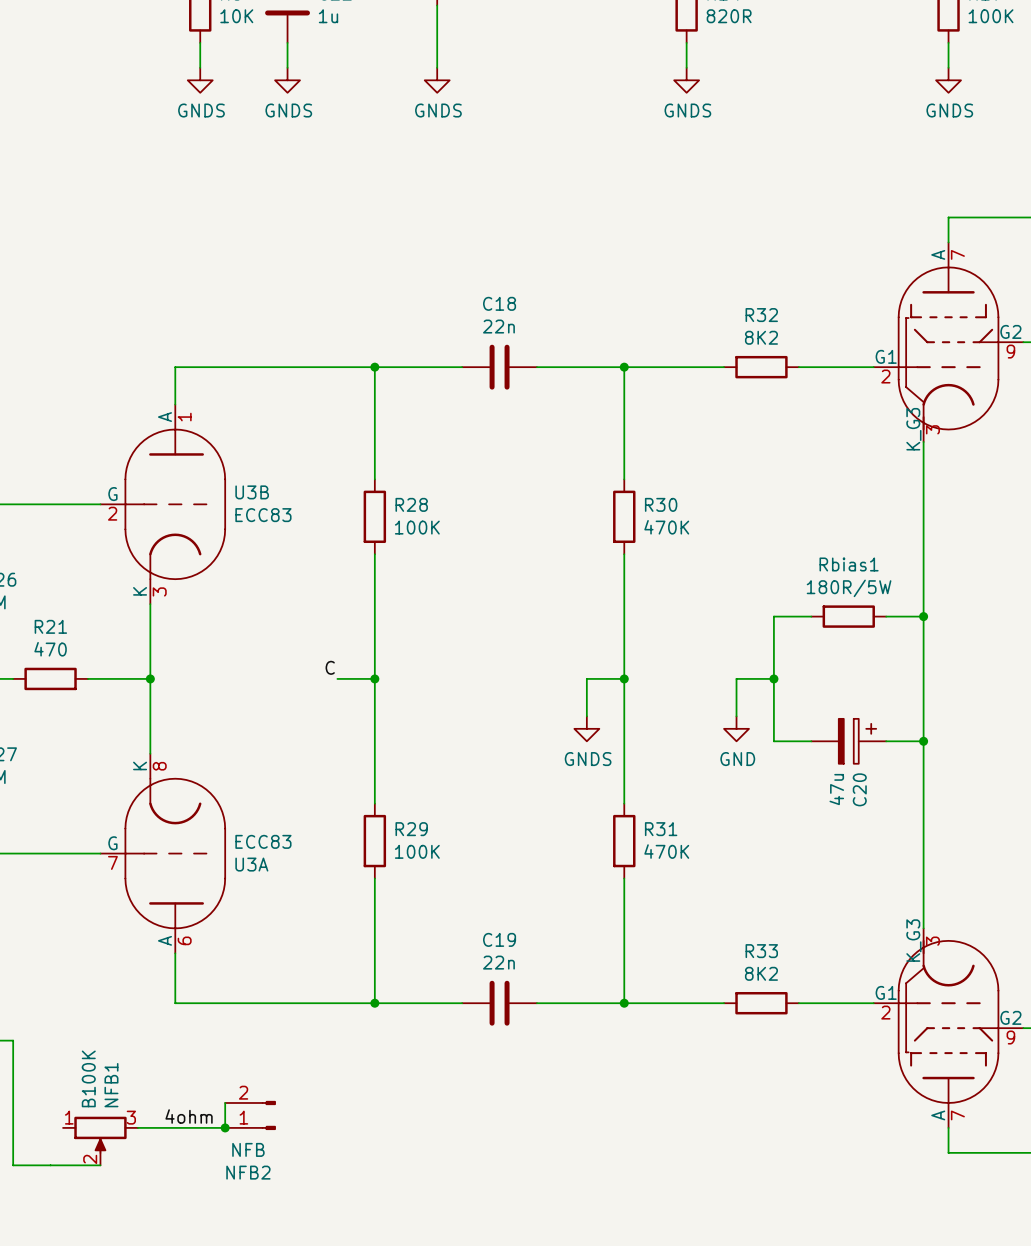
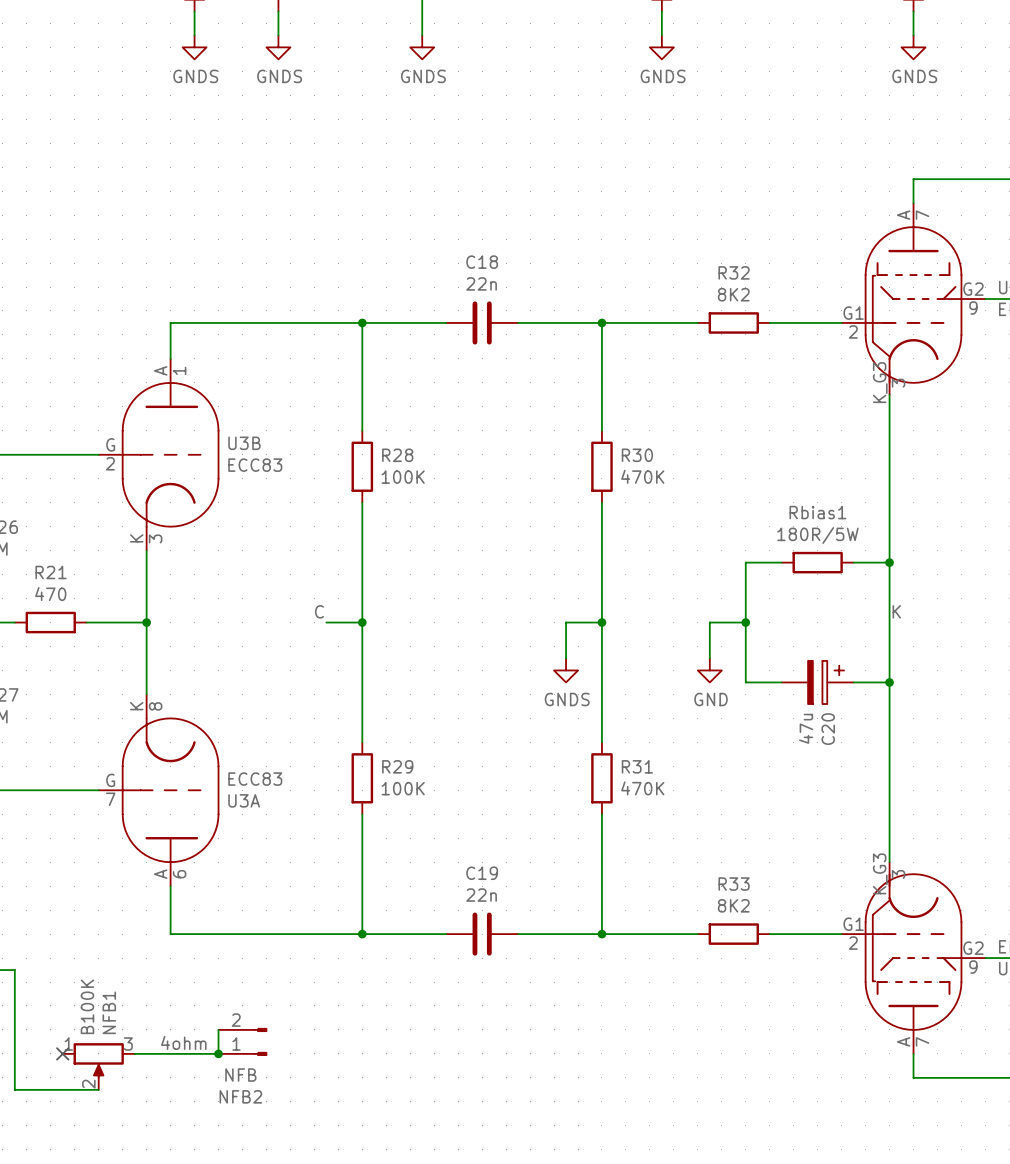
label: none -> K (896, 611)
no-connect mark: none -> (62, 1053)

